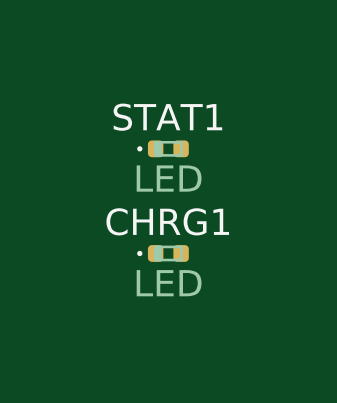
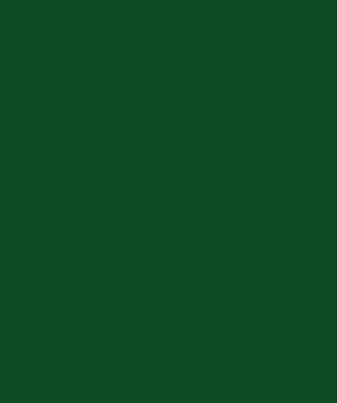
STAT1: LED (163, 148) -> none
CHRG1: LED (163, 253) -> none

